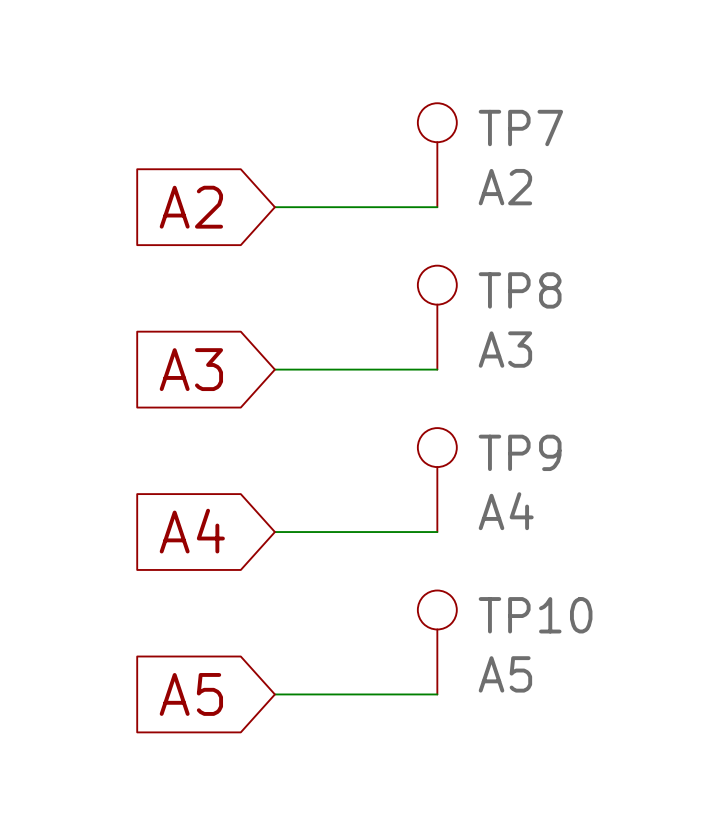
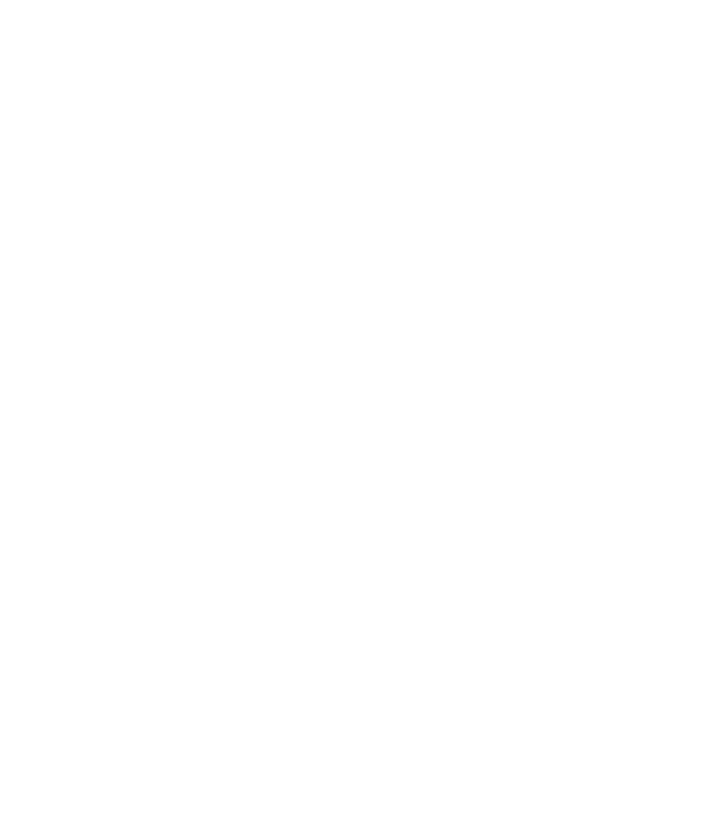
TP7: A2 (437, 155) -> none
global label: A2 (191, 207) -> none
wire: (274, 207) (437, 207) -> none
TP8: A3 (437, 317) -> none
global label: A3 (191, 369) -> none
wire: (274, 369) (437, 369) -> none
TP9: A4 (437, 480) -> none
global label: A4 (192, 531) -> none
wire: (274, 532) (437, 532) -> none
TP10: A5 (437, 642) -> none
global label: A5 (191, 694) -> none
wire: (274, 694) (437, 694) -> none

